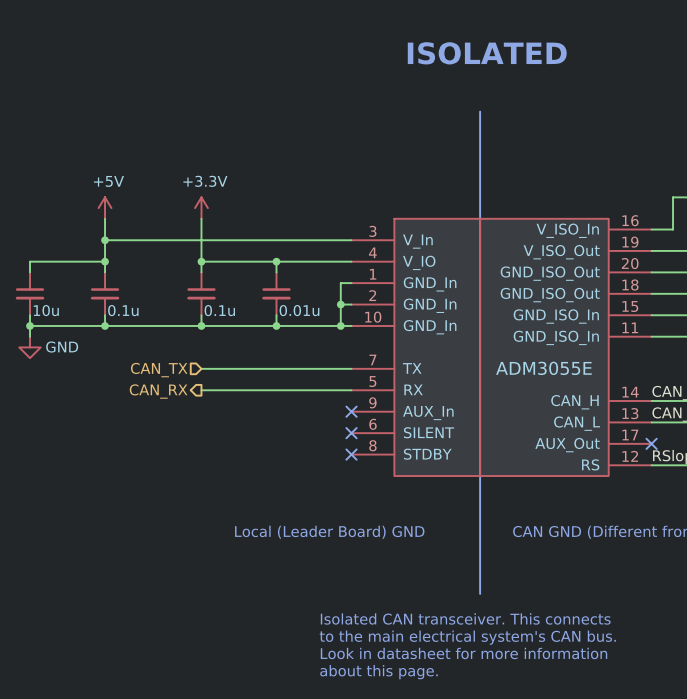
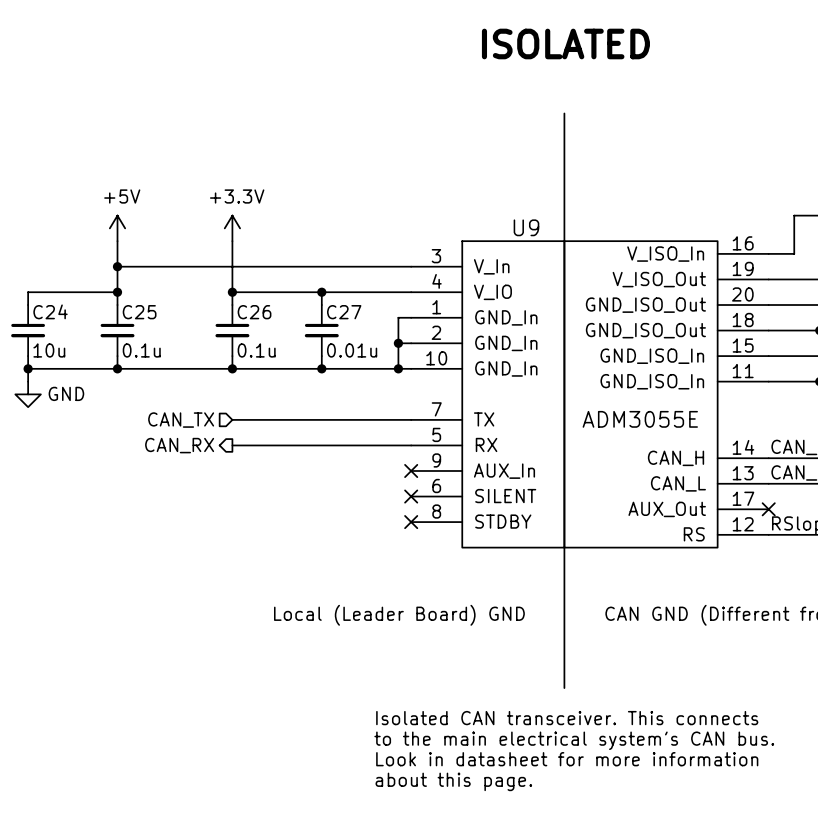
U9 name: none -> U9 (526, 227)
C24 name: none -> C24 (50, 311)
C25 name: none -> C25 (139, 312)
C26 name: none -> C26 (254, 312)
C27 name: none -> C27 (344, 312)

